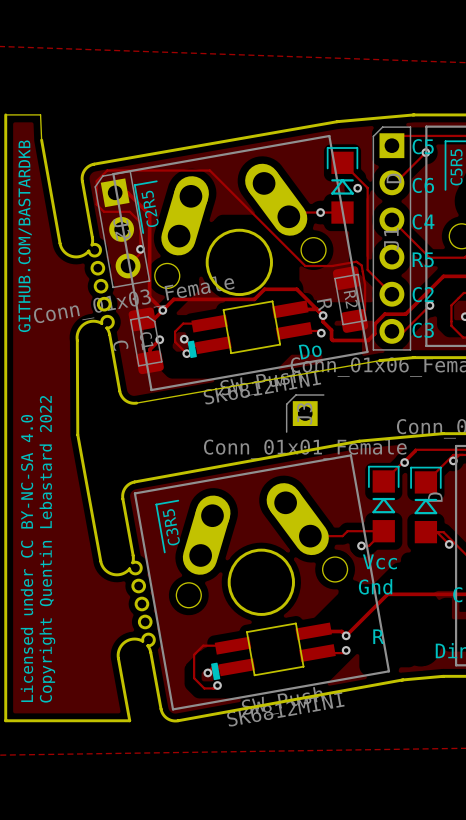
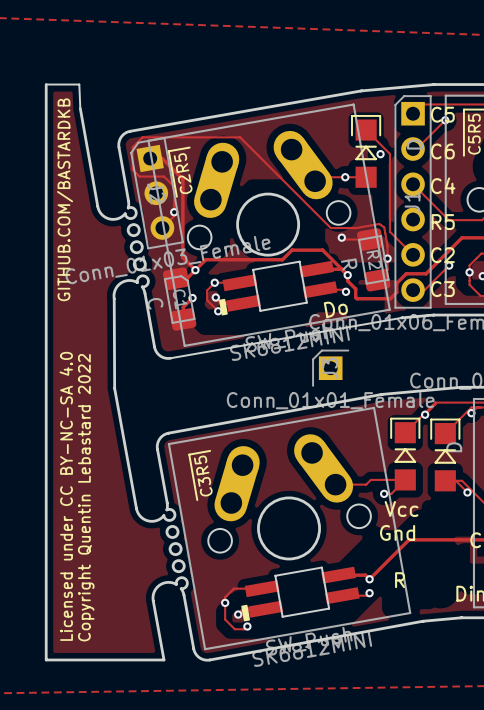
track: none -> (341, 237) (343, 239) (370, 239)
via: none -> (341, 237)
via: none -> (387, 258)
via: none -> (469, 272)
via: none -> (214, 282)
via: none -> (225, 602)

